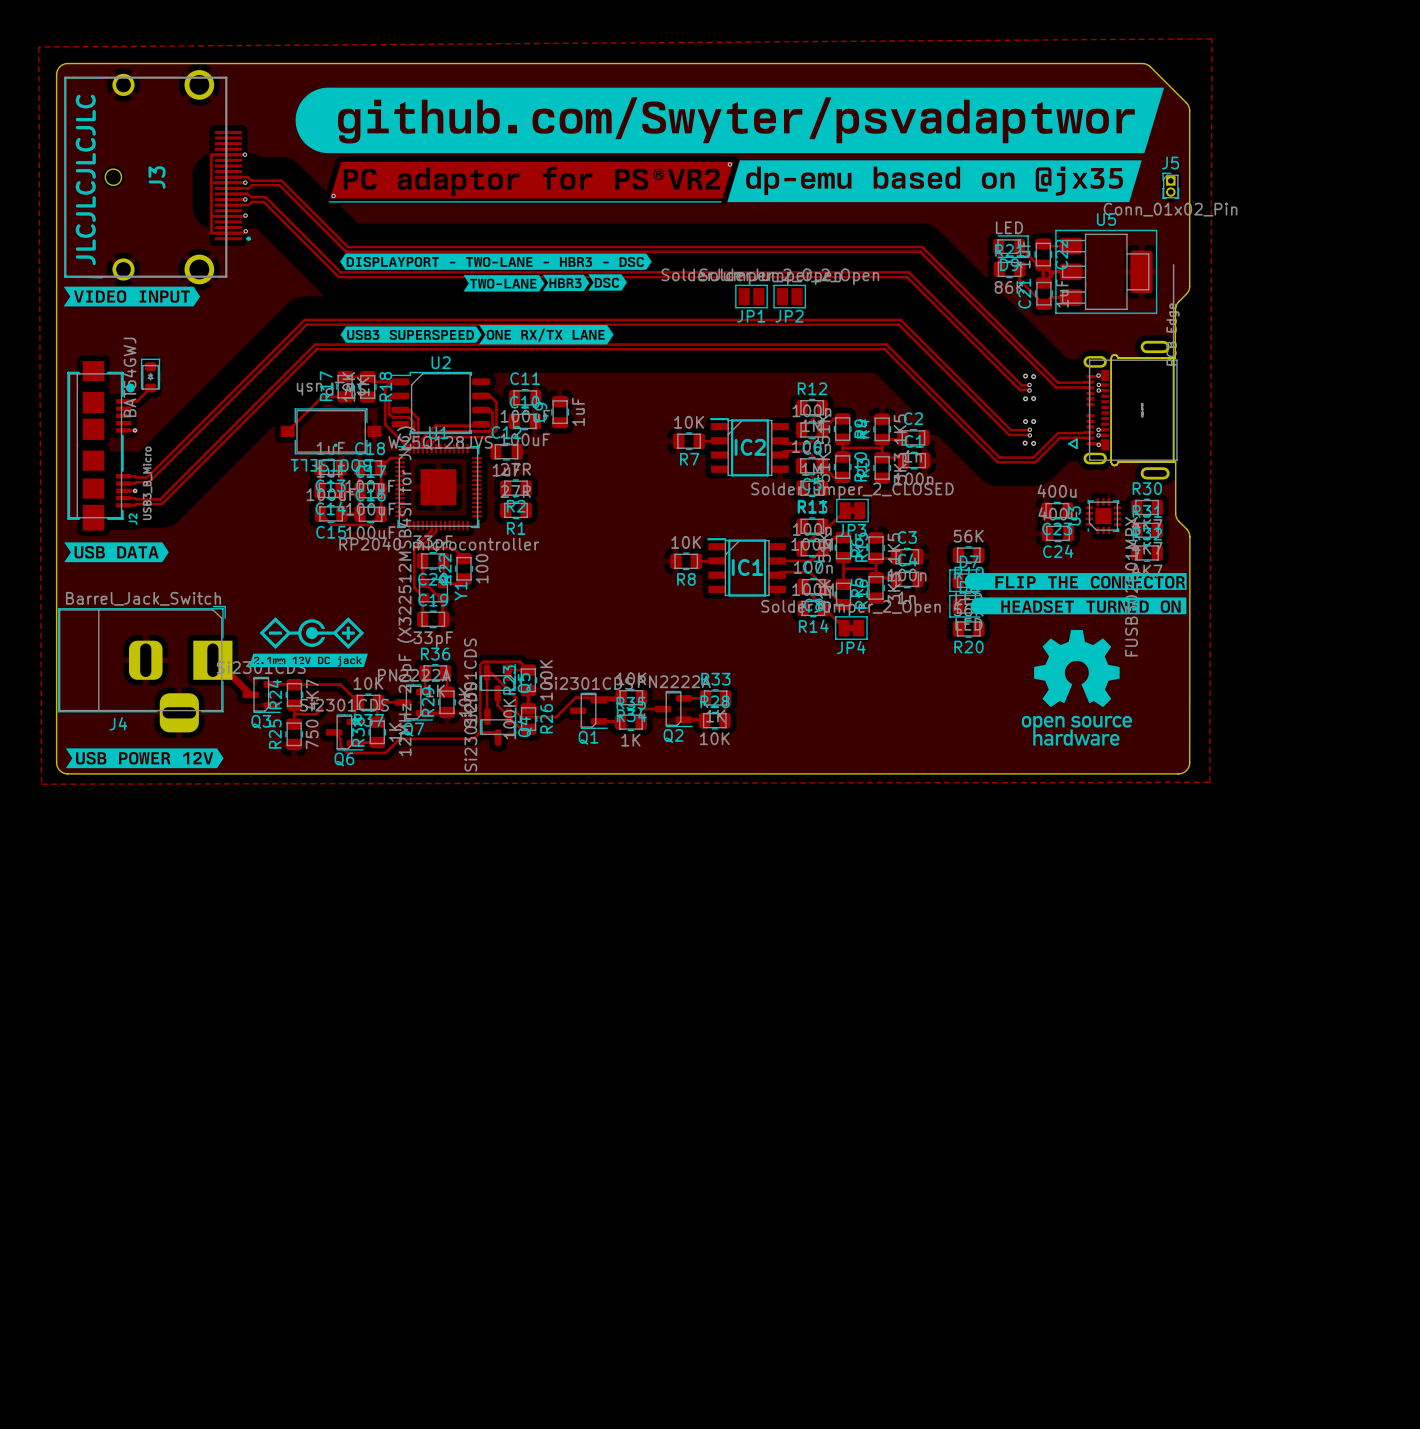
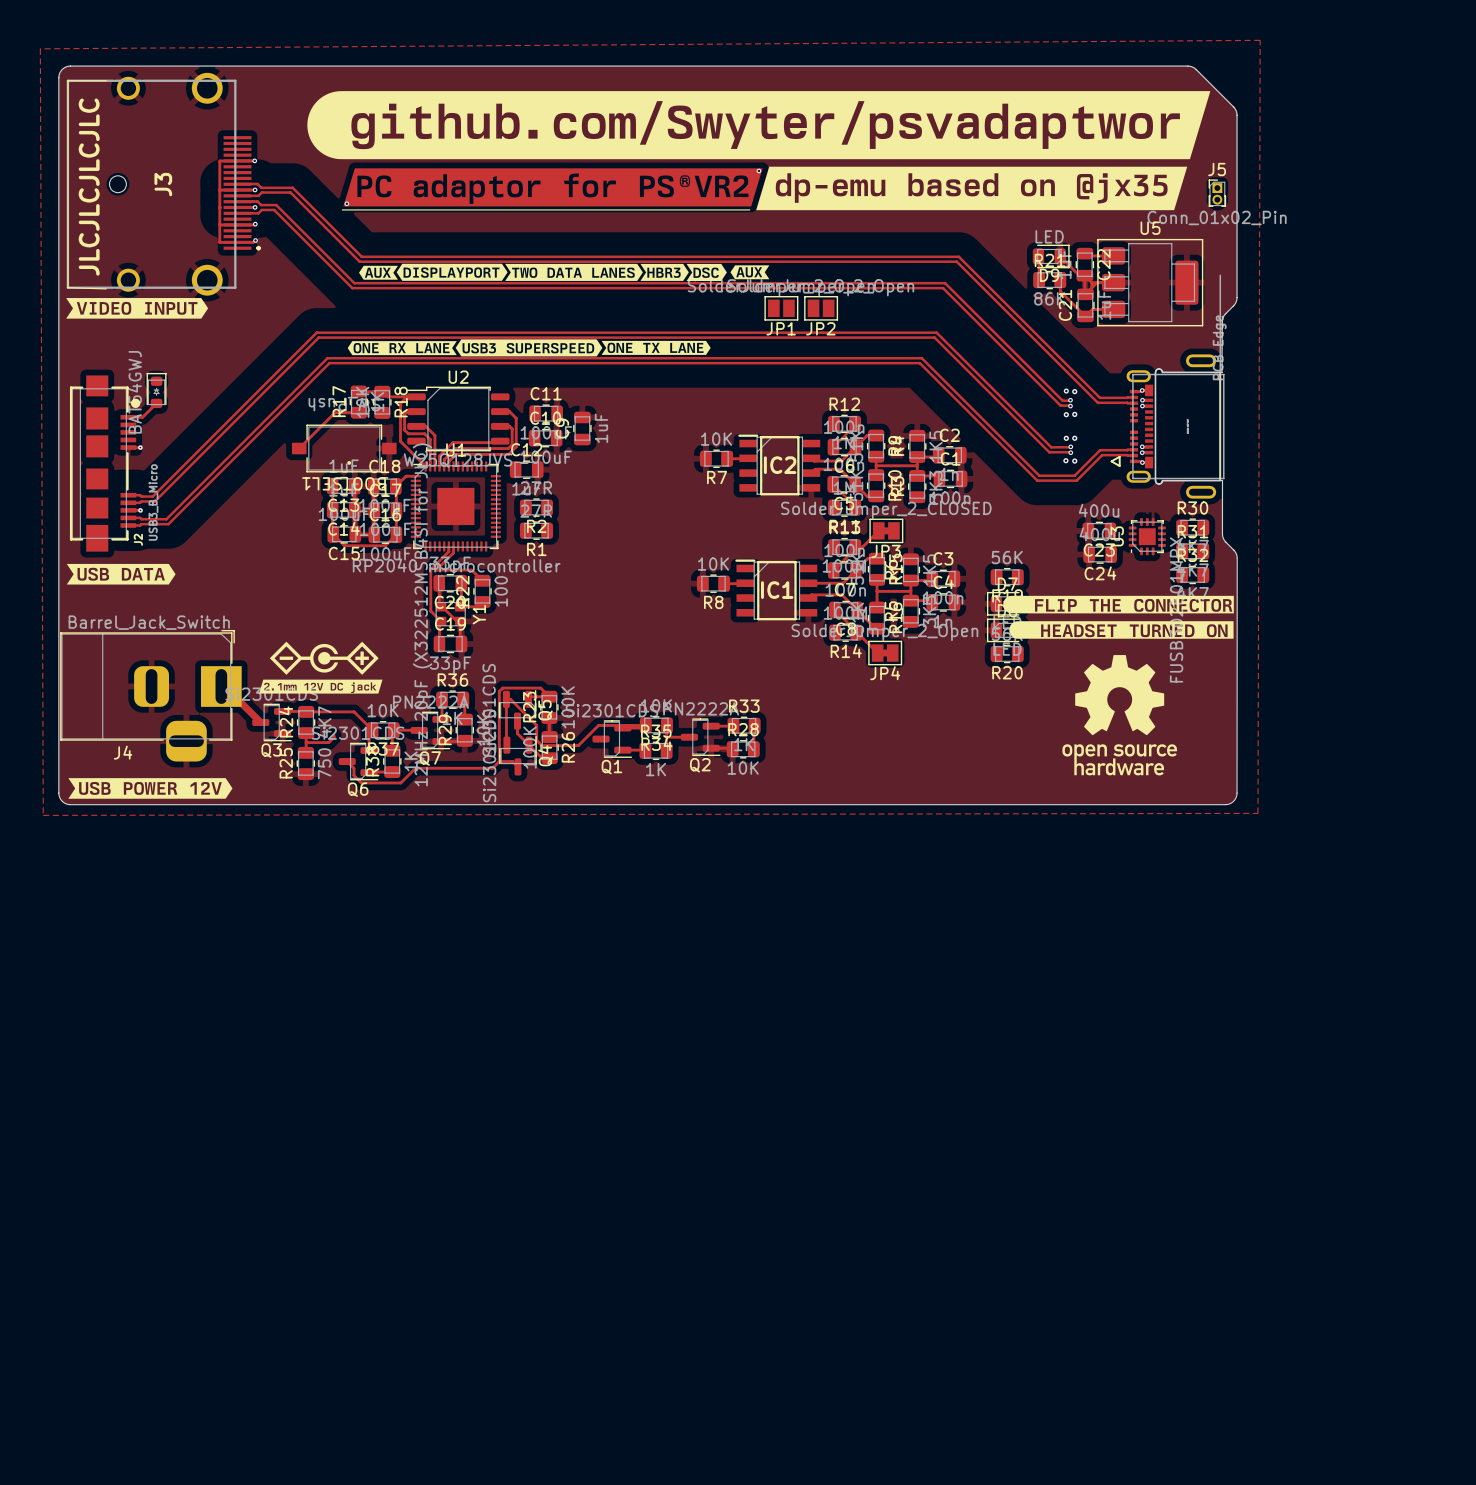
drawing: [340, 253, 652, 292] -> none
drawing: none -> [359, 263, 643, 281]
drawing: none -> [730, 265, 770, 280]
drawing position: (566, 282) -> (664, 272)
drawing position: (607, 282) -> (706, 272)
drawing: [479, 325, 614, 345] -> none
drawing: none -> [601, 340, 711, 355]
drawing: none -> [347, 341, 457, 356]
drawing position: (411, 334) -> (529, 347)

